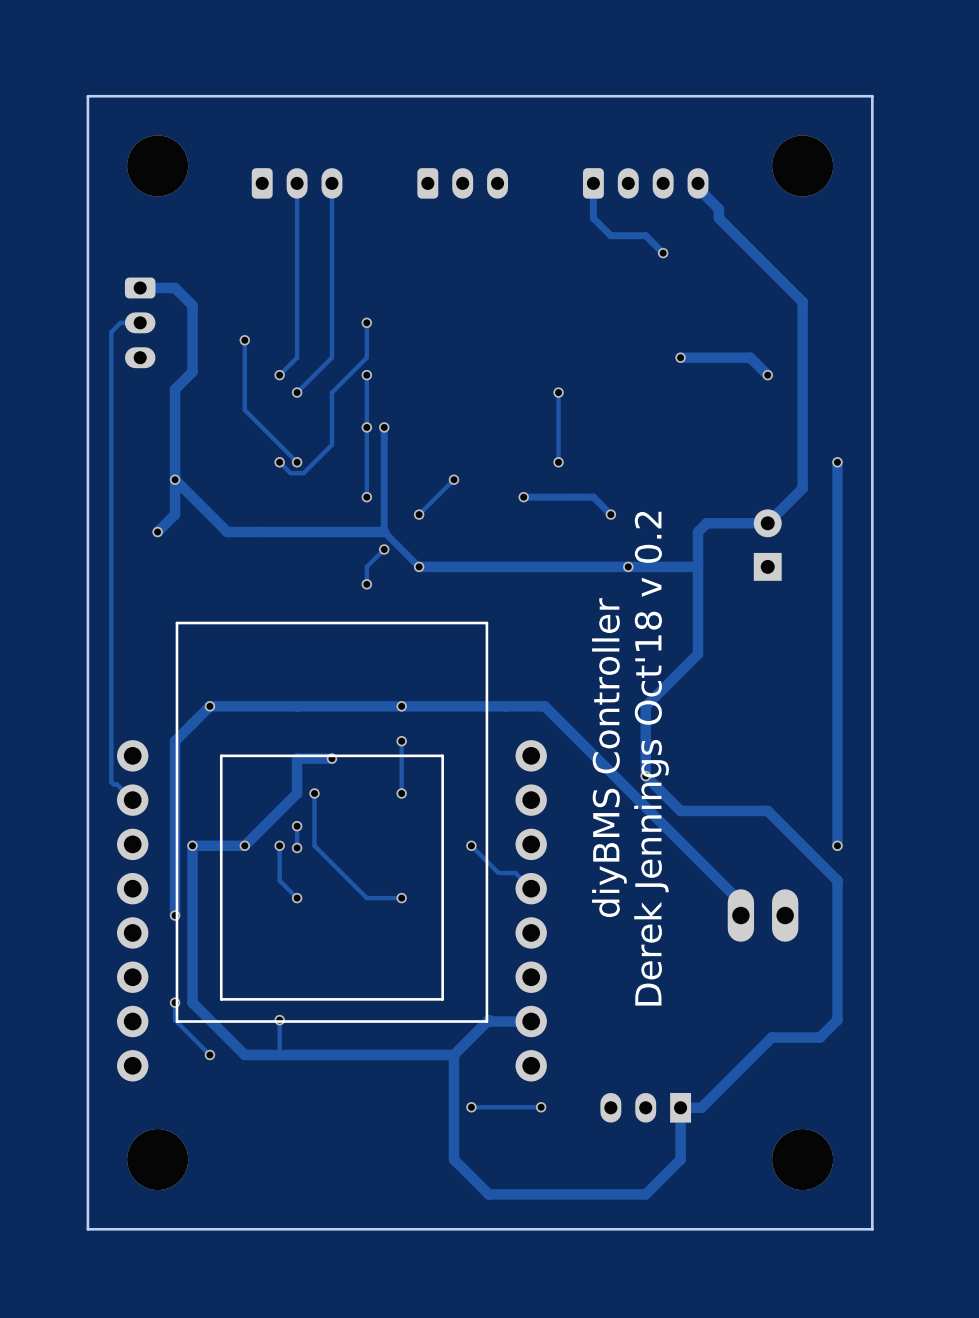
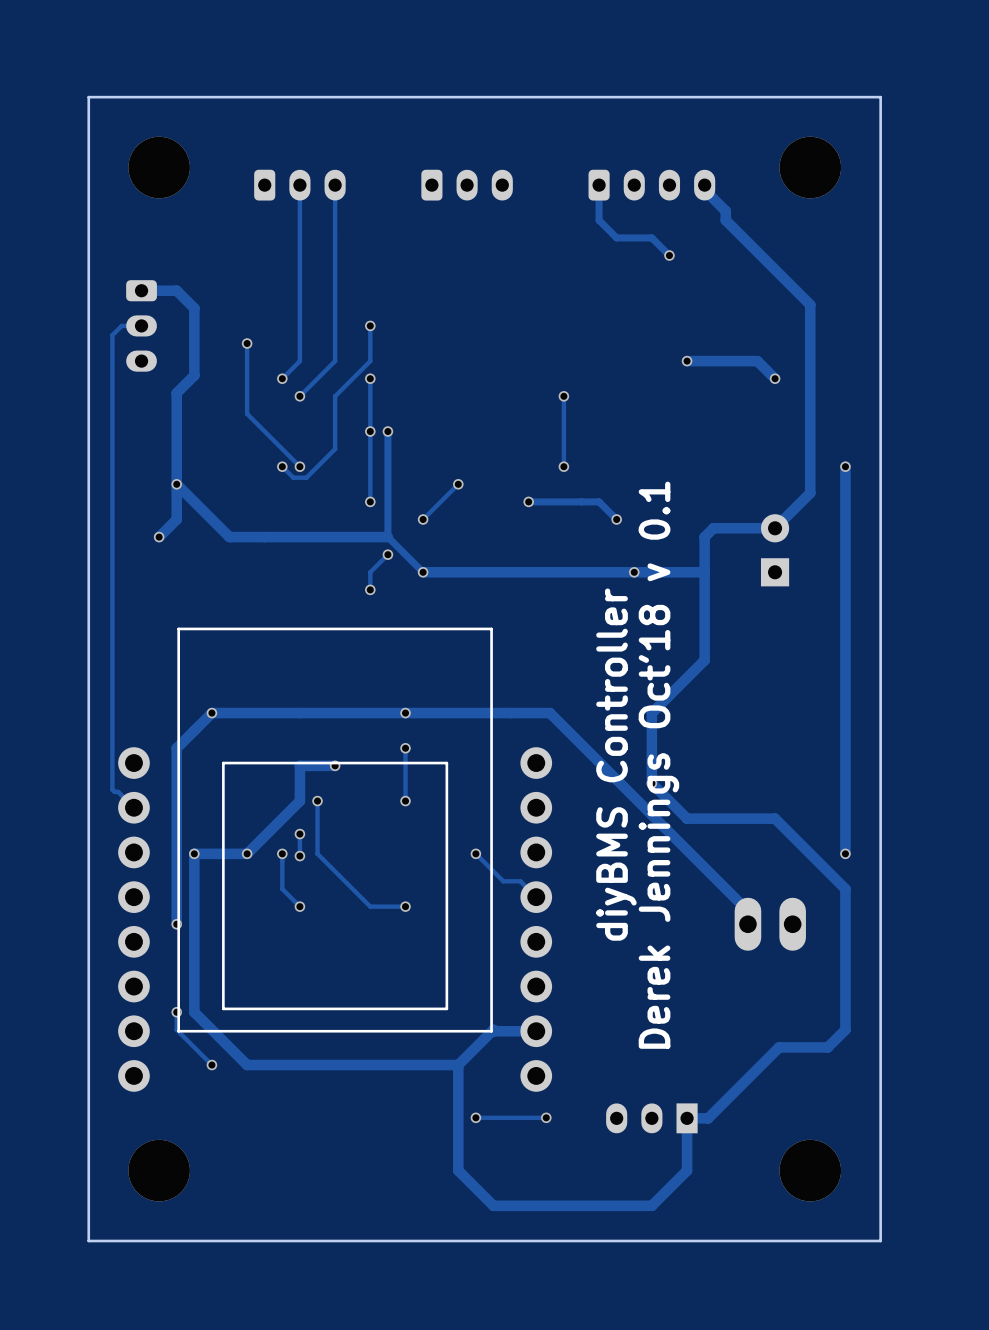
text: Derek Jennings Oct'18 v 0.2 (651, 758) -> Derek Jennings Oct'18 v 0.1 (658, 765)
track: (279, 1020) (279, 1054) -> none
via: (279, 1020) -> none

